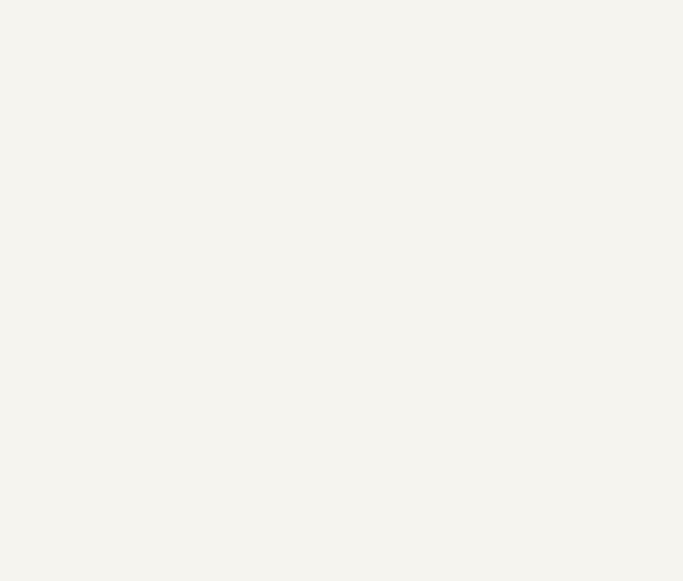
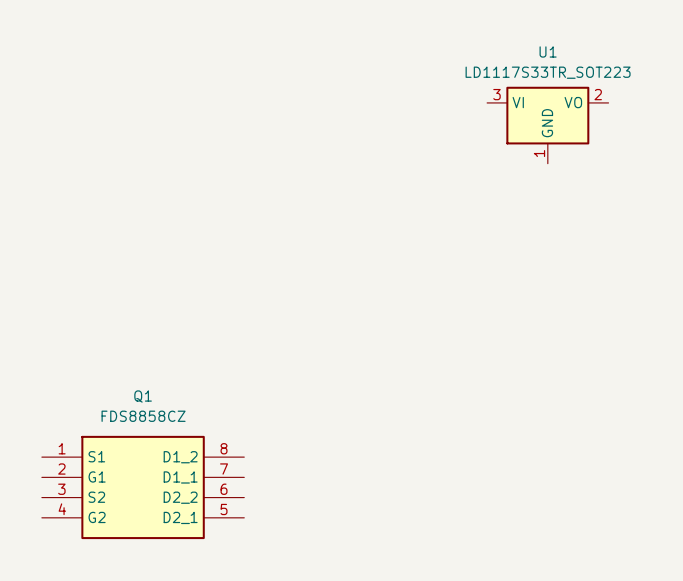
U1: none -> LD1117S33TR_SOT223 (547, 125)
Q1: none -> FDS8858CZ (143, 487)

